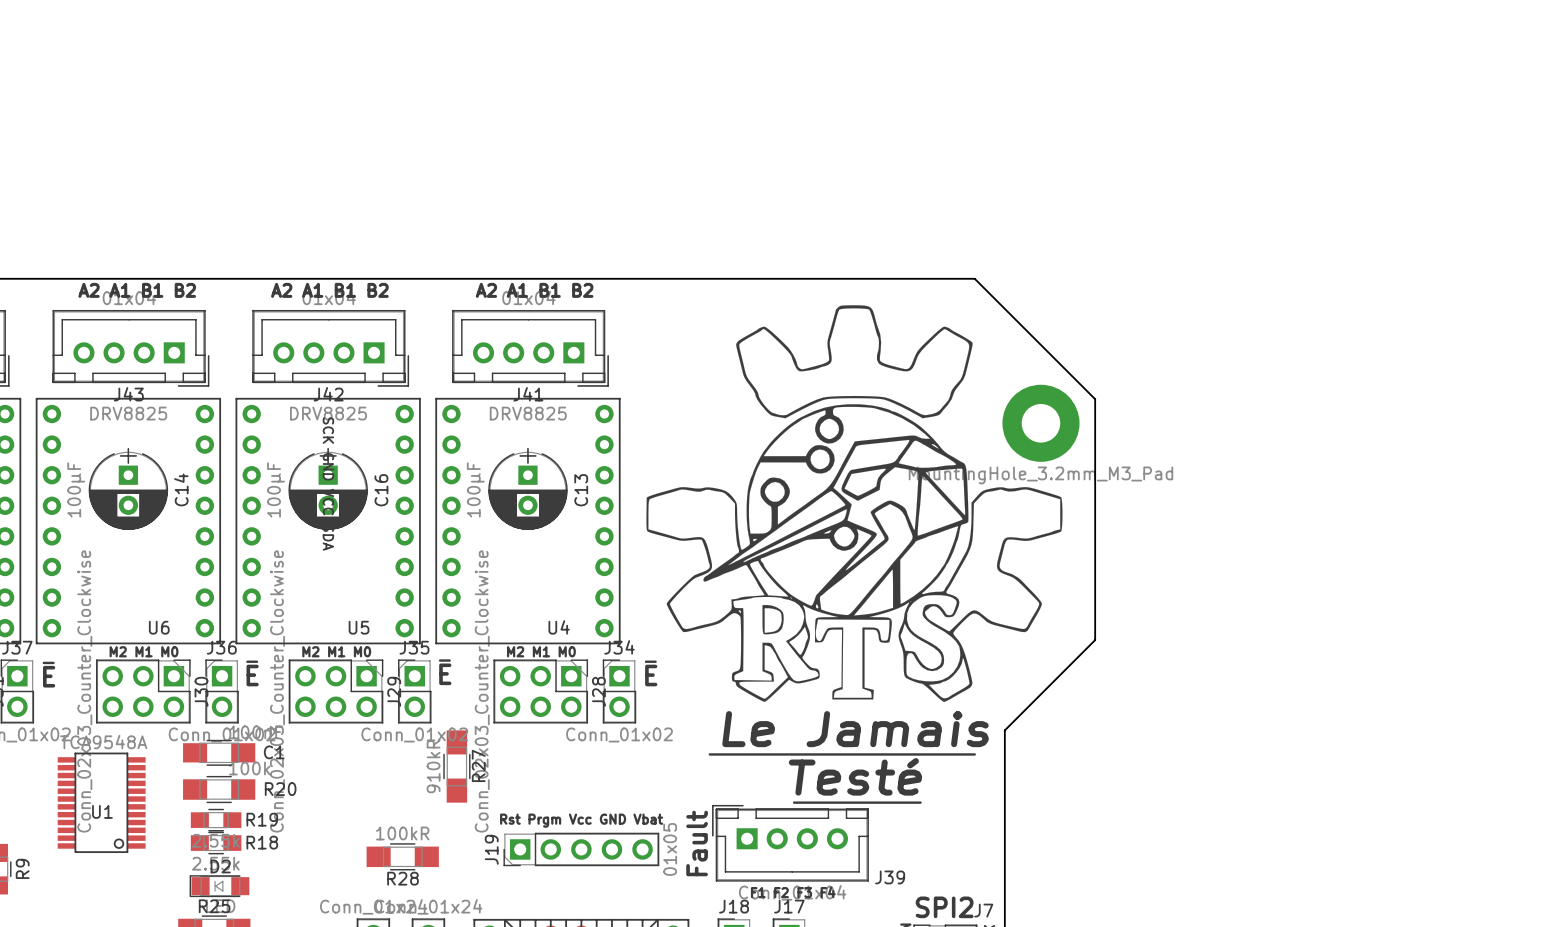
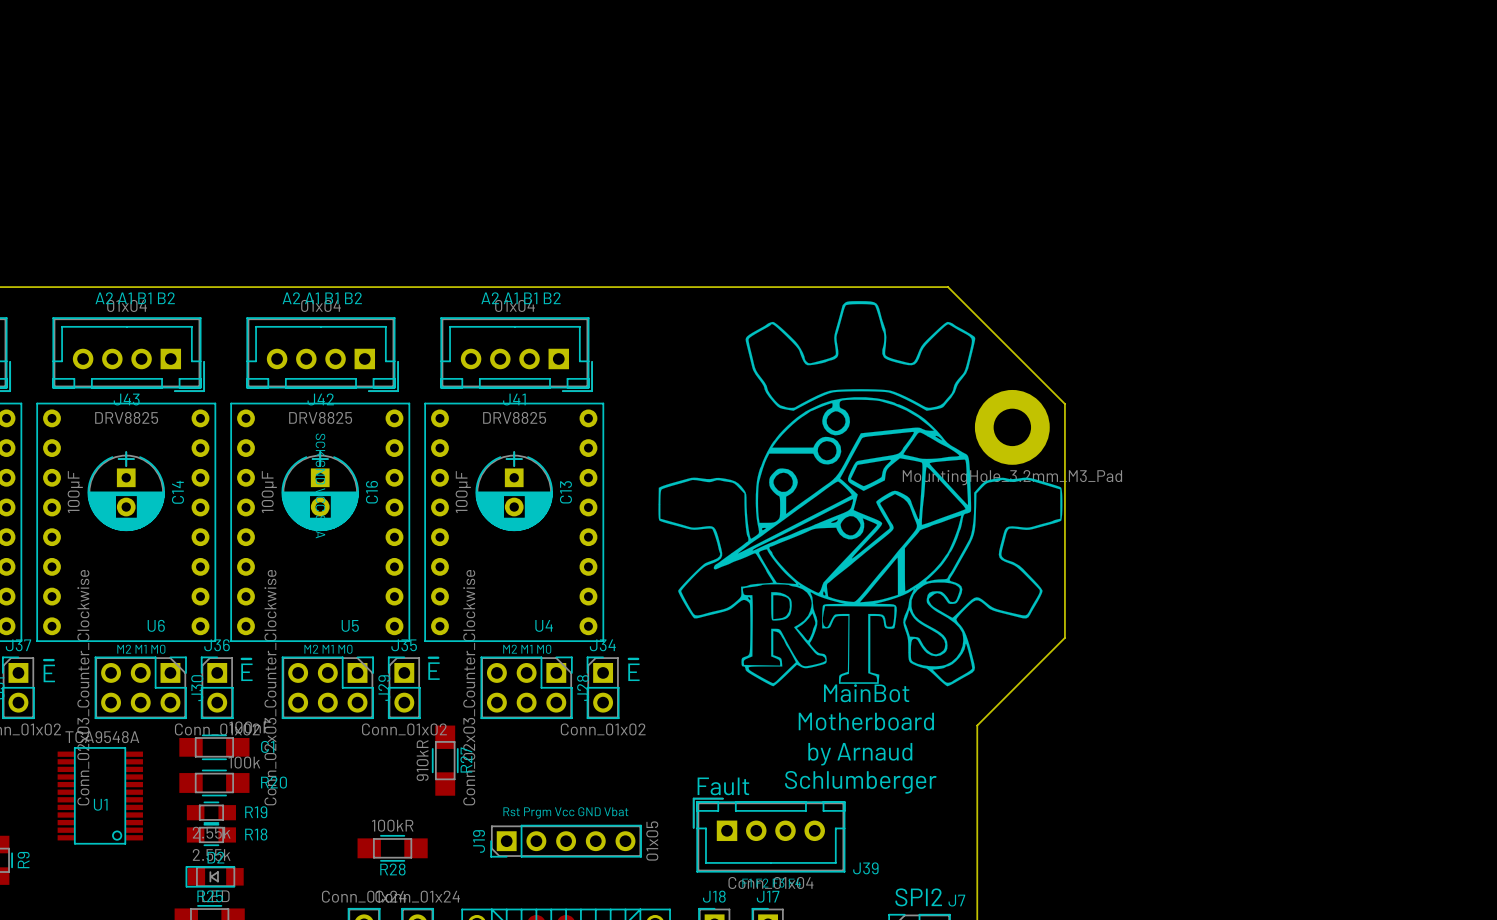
drawing position: (854, 503) -> (860, 493)
text: none -> MainBot (866, 693)
text: none -> Motherboard (866, 721)
text: Le Jamais (855, 729) -> none
line: (709, 754) (974, 754) -> none
text: none -> by Arnaud (860, 754)
text: Testé (855, 776) -> none
text: none -> Schlumberger (860, 782)
line: (794, 802) (920, 802) -> none
text rotation: 0° (697, 843) -> 90° clockwise (723, 786)

